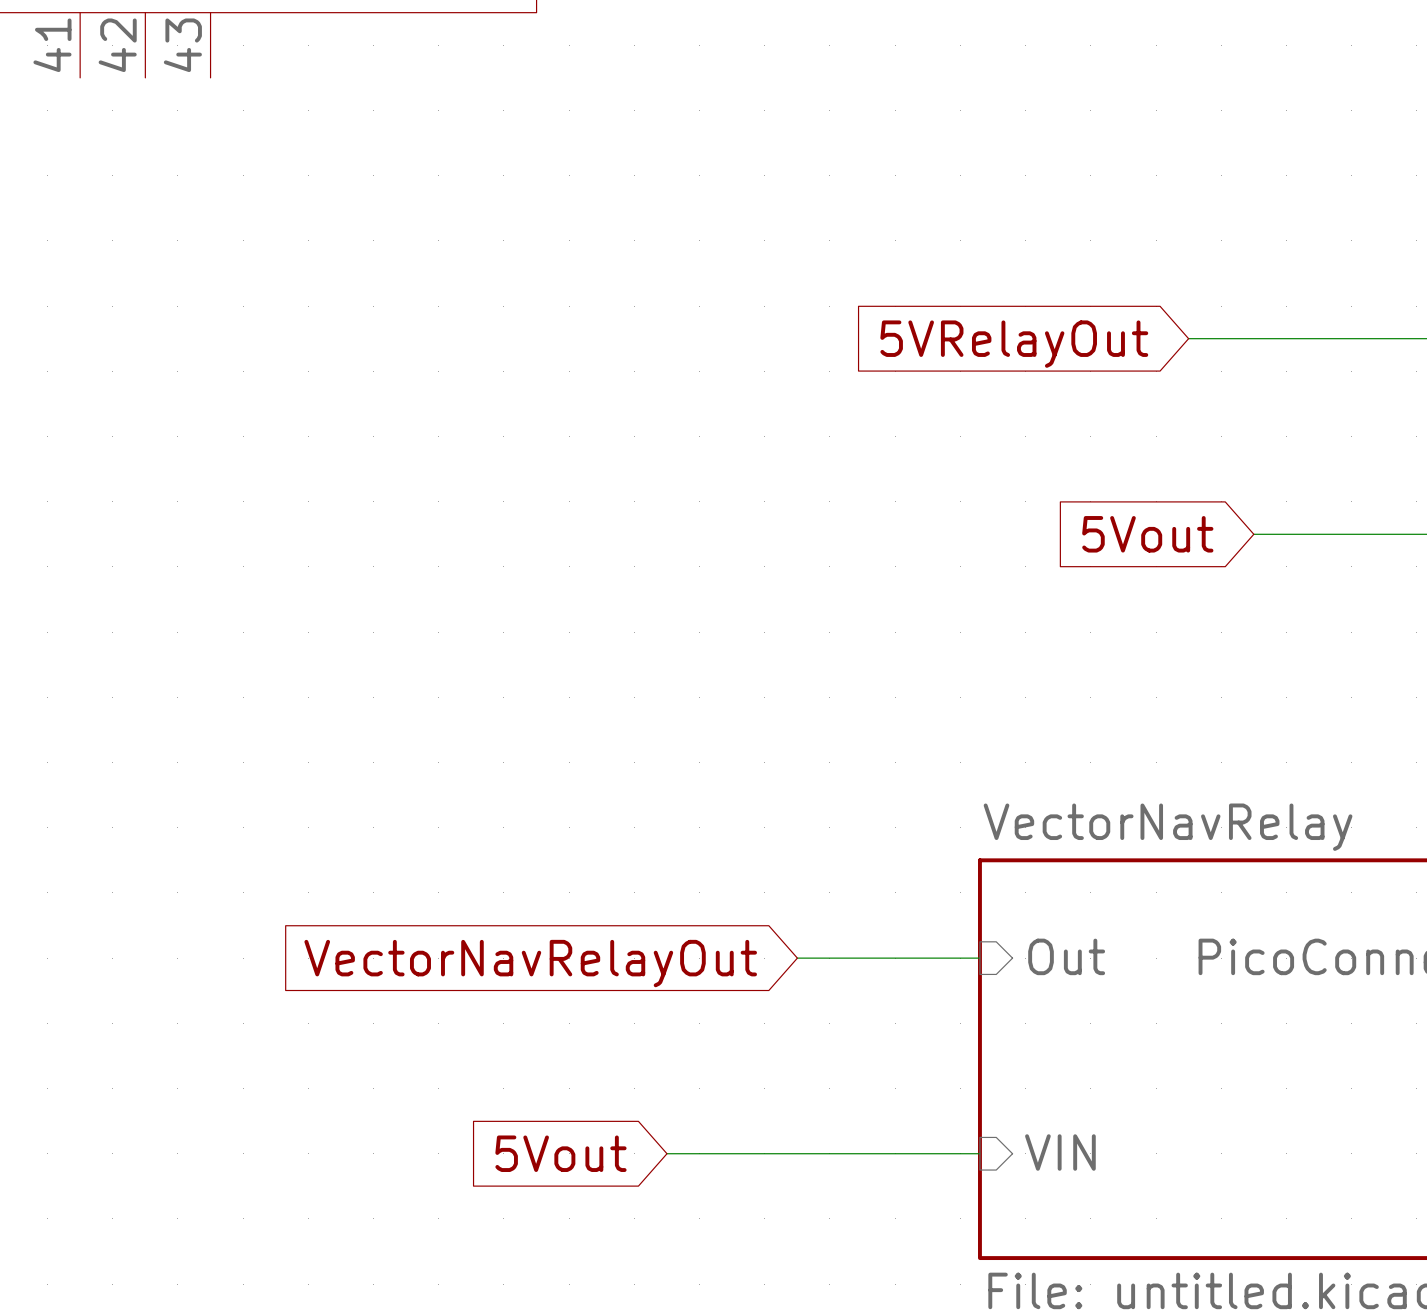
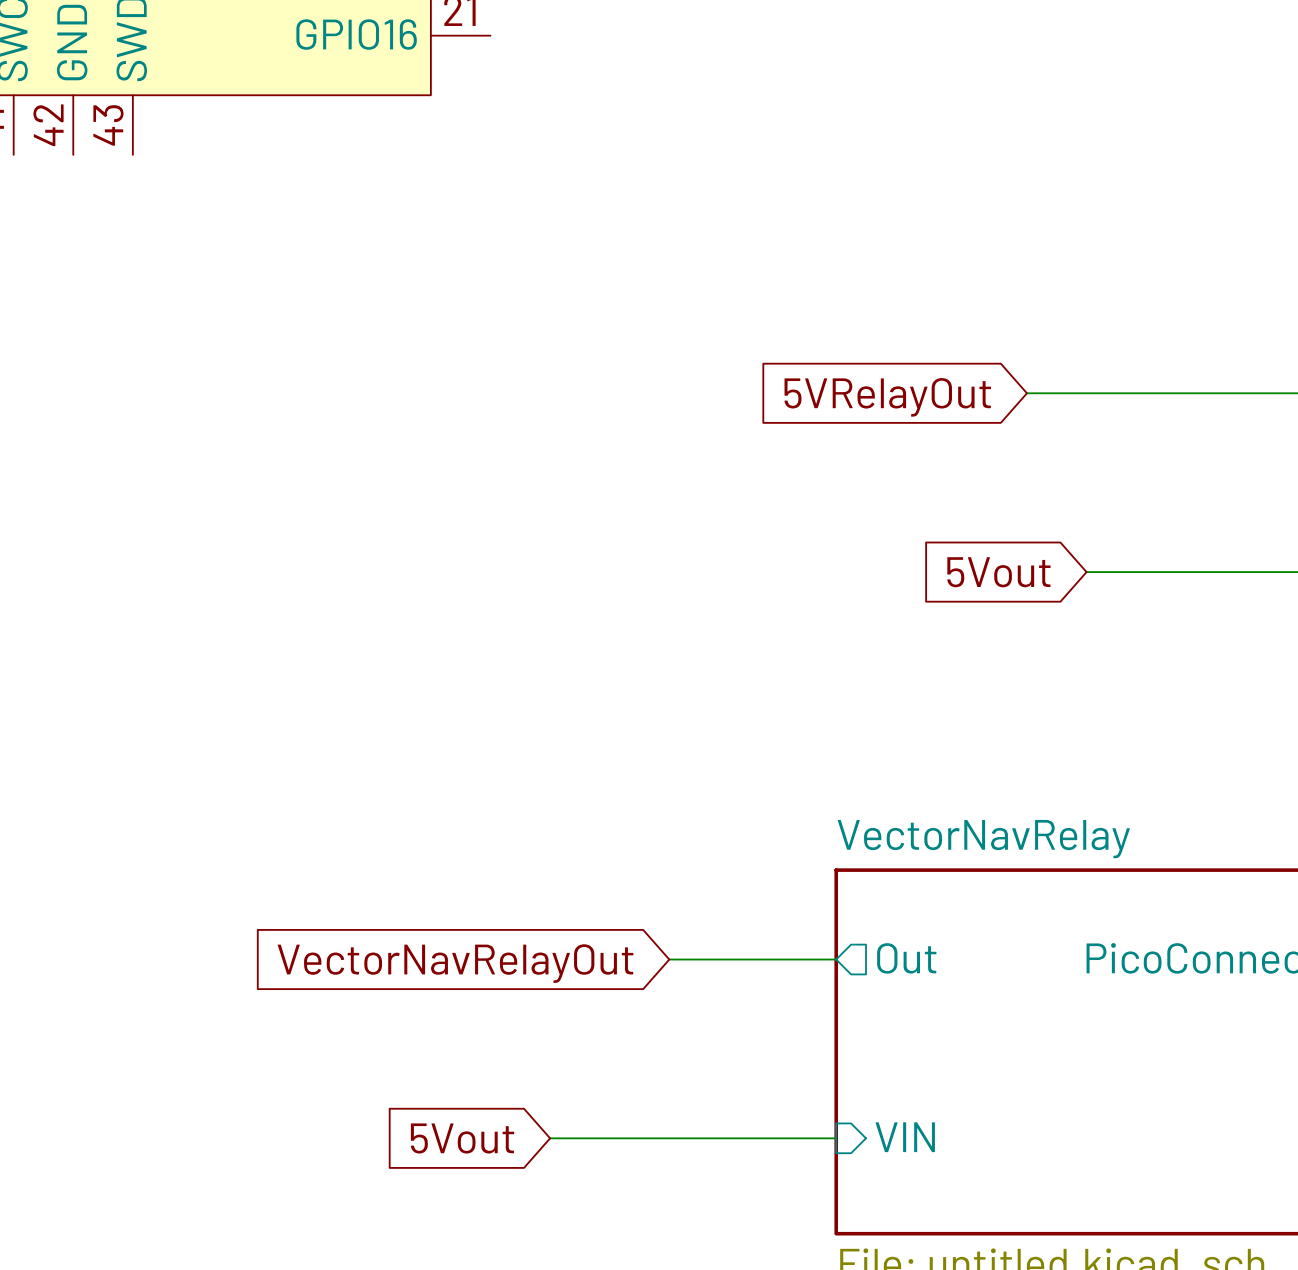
sheet pin shape: input (1066, 956) -> output (906, 958)

